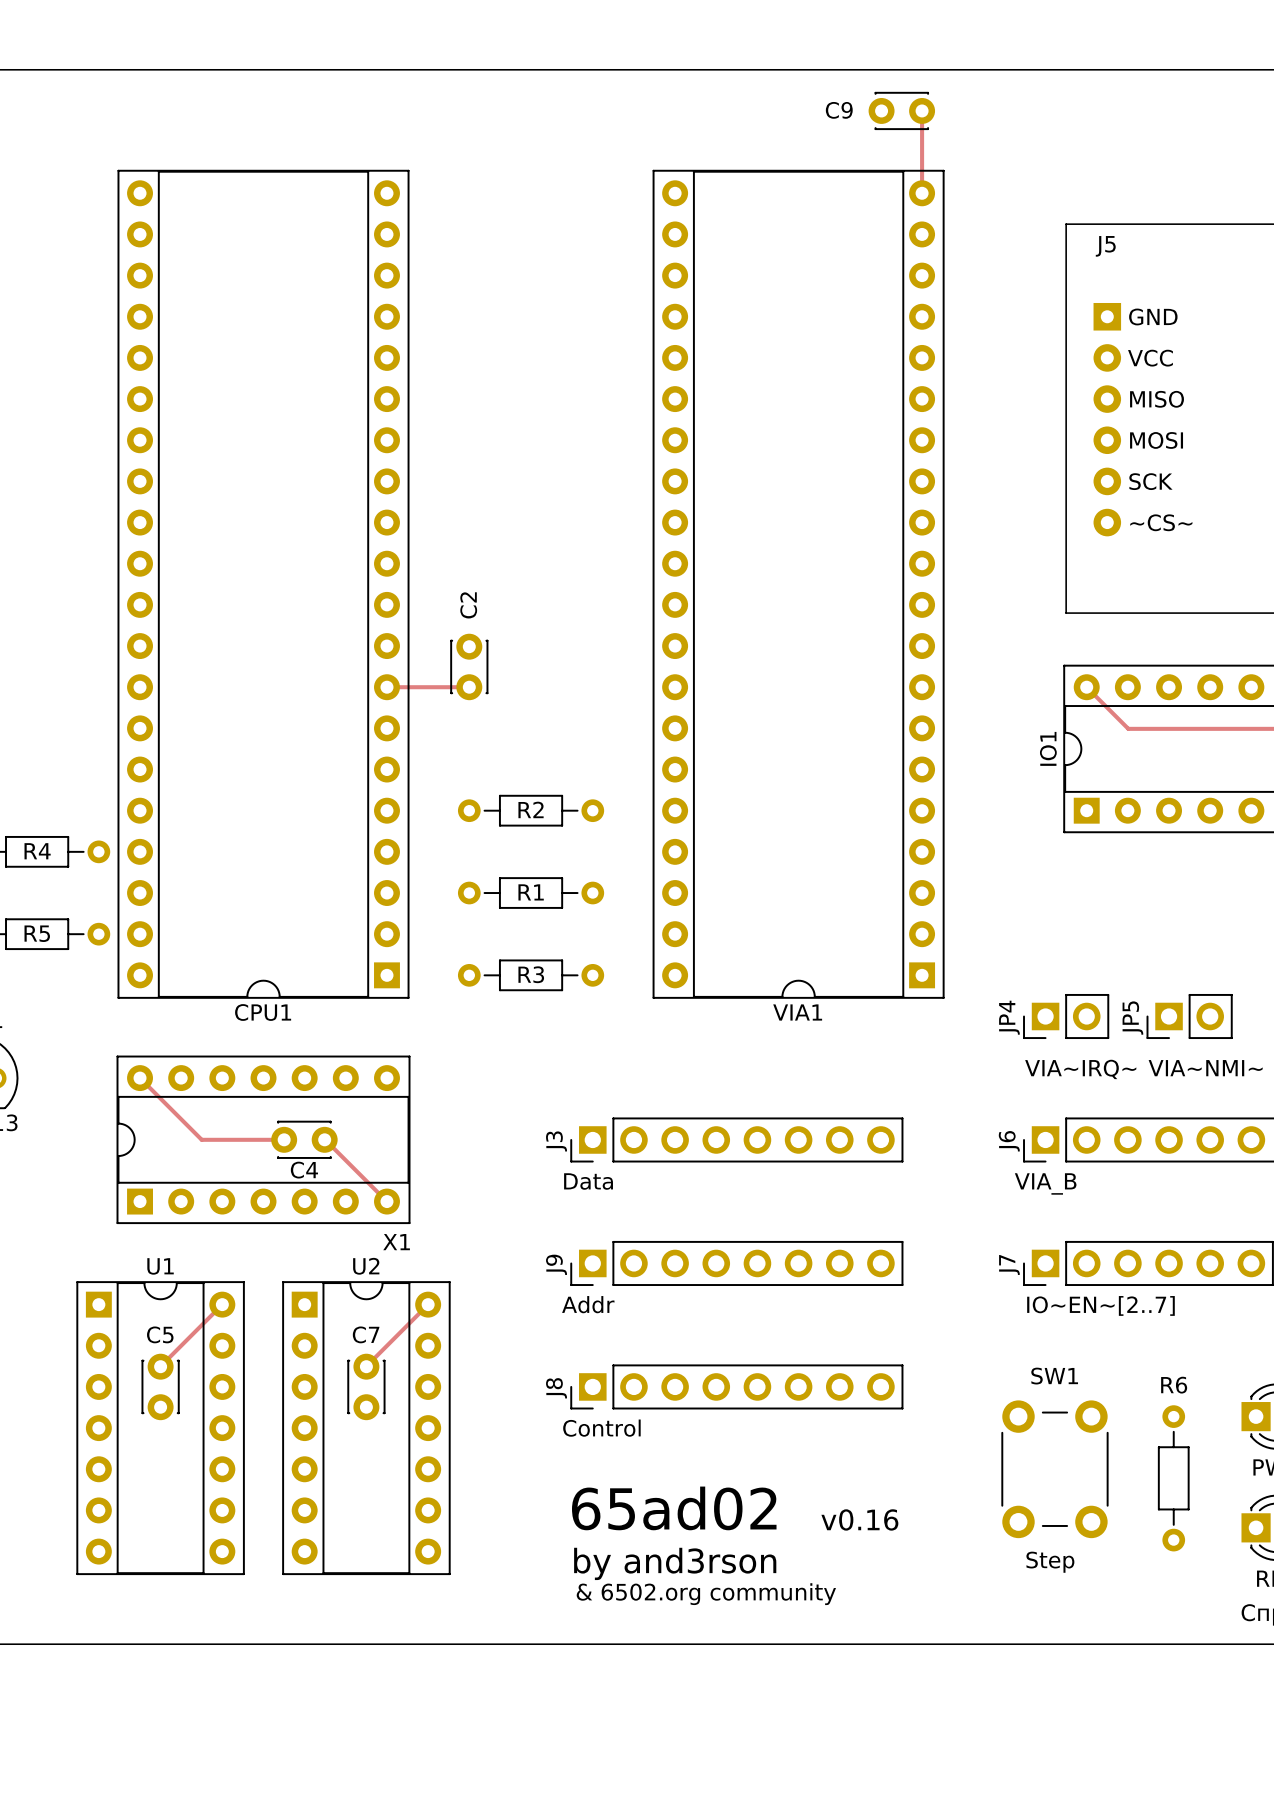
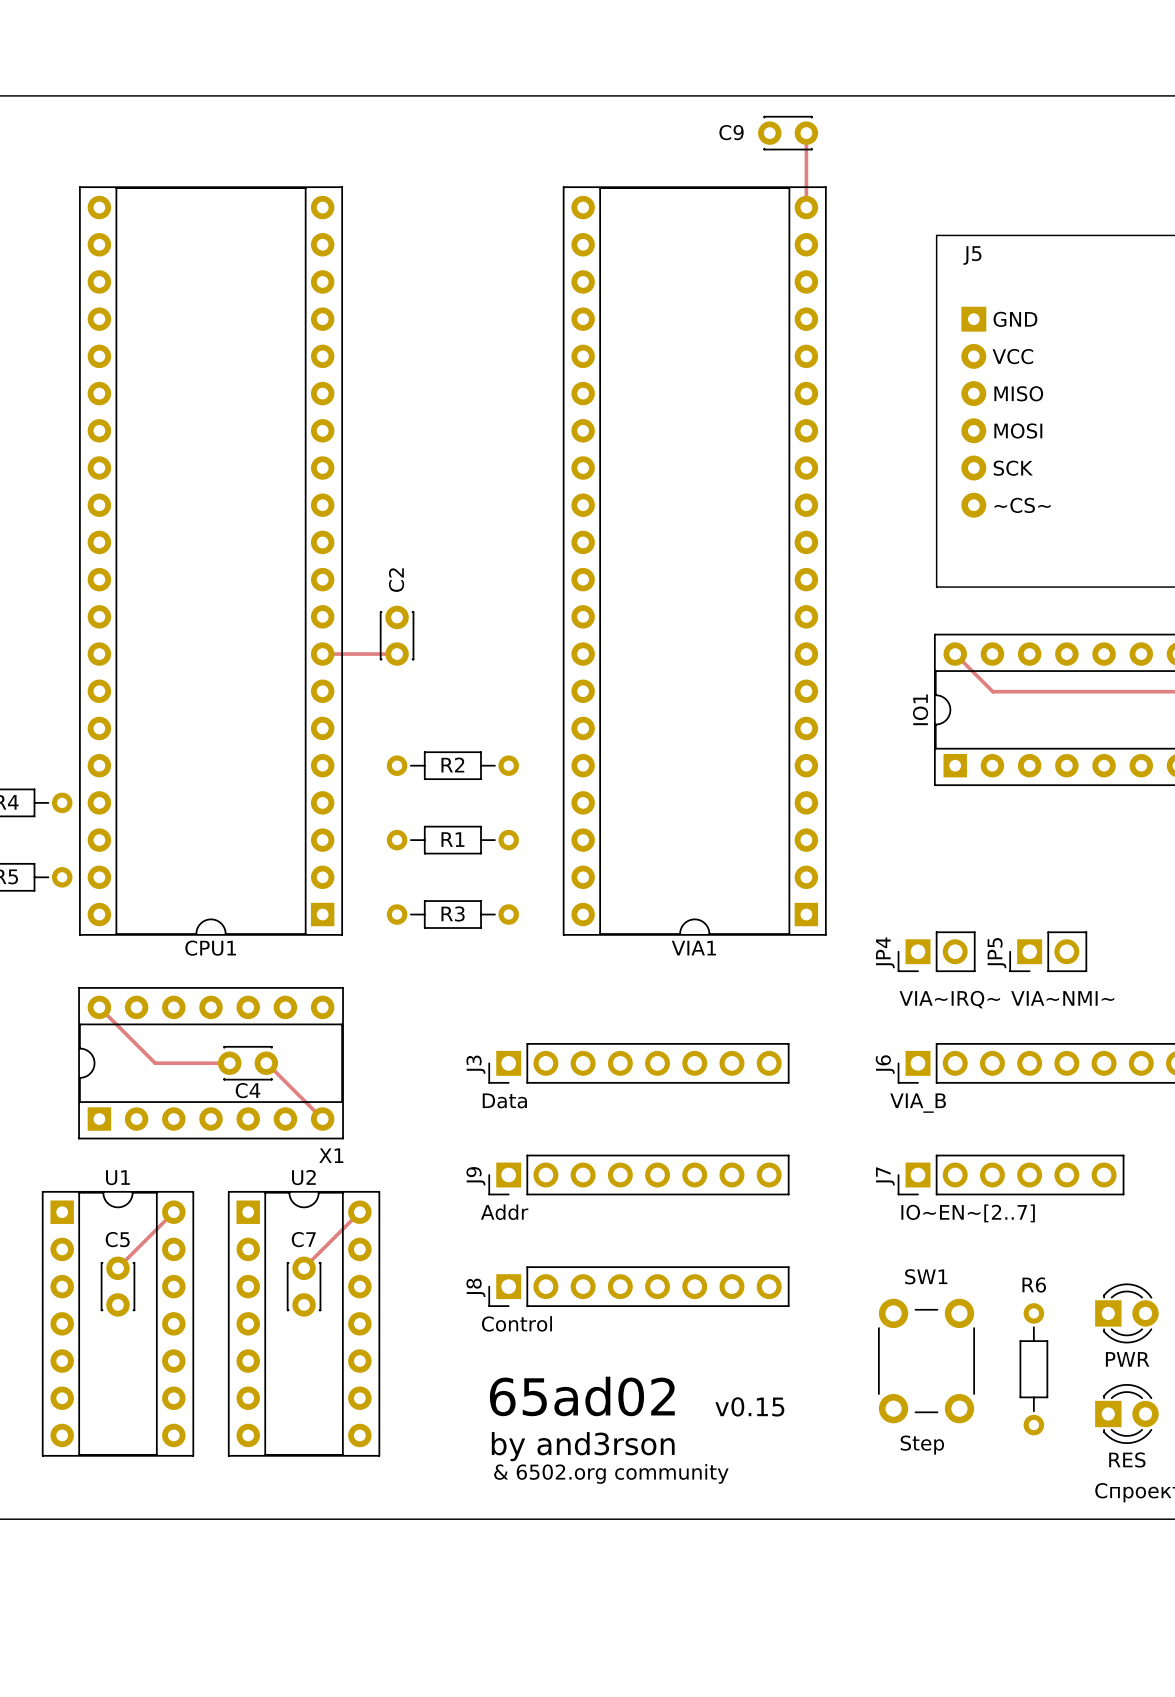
text: v0.16 (859, 1519) -> v0.15 (749, 1406)

